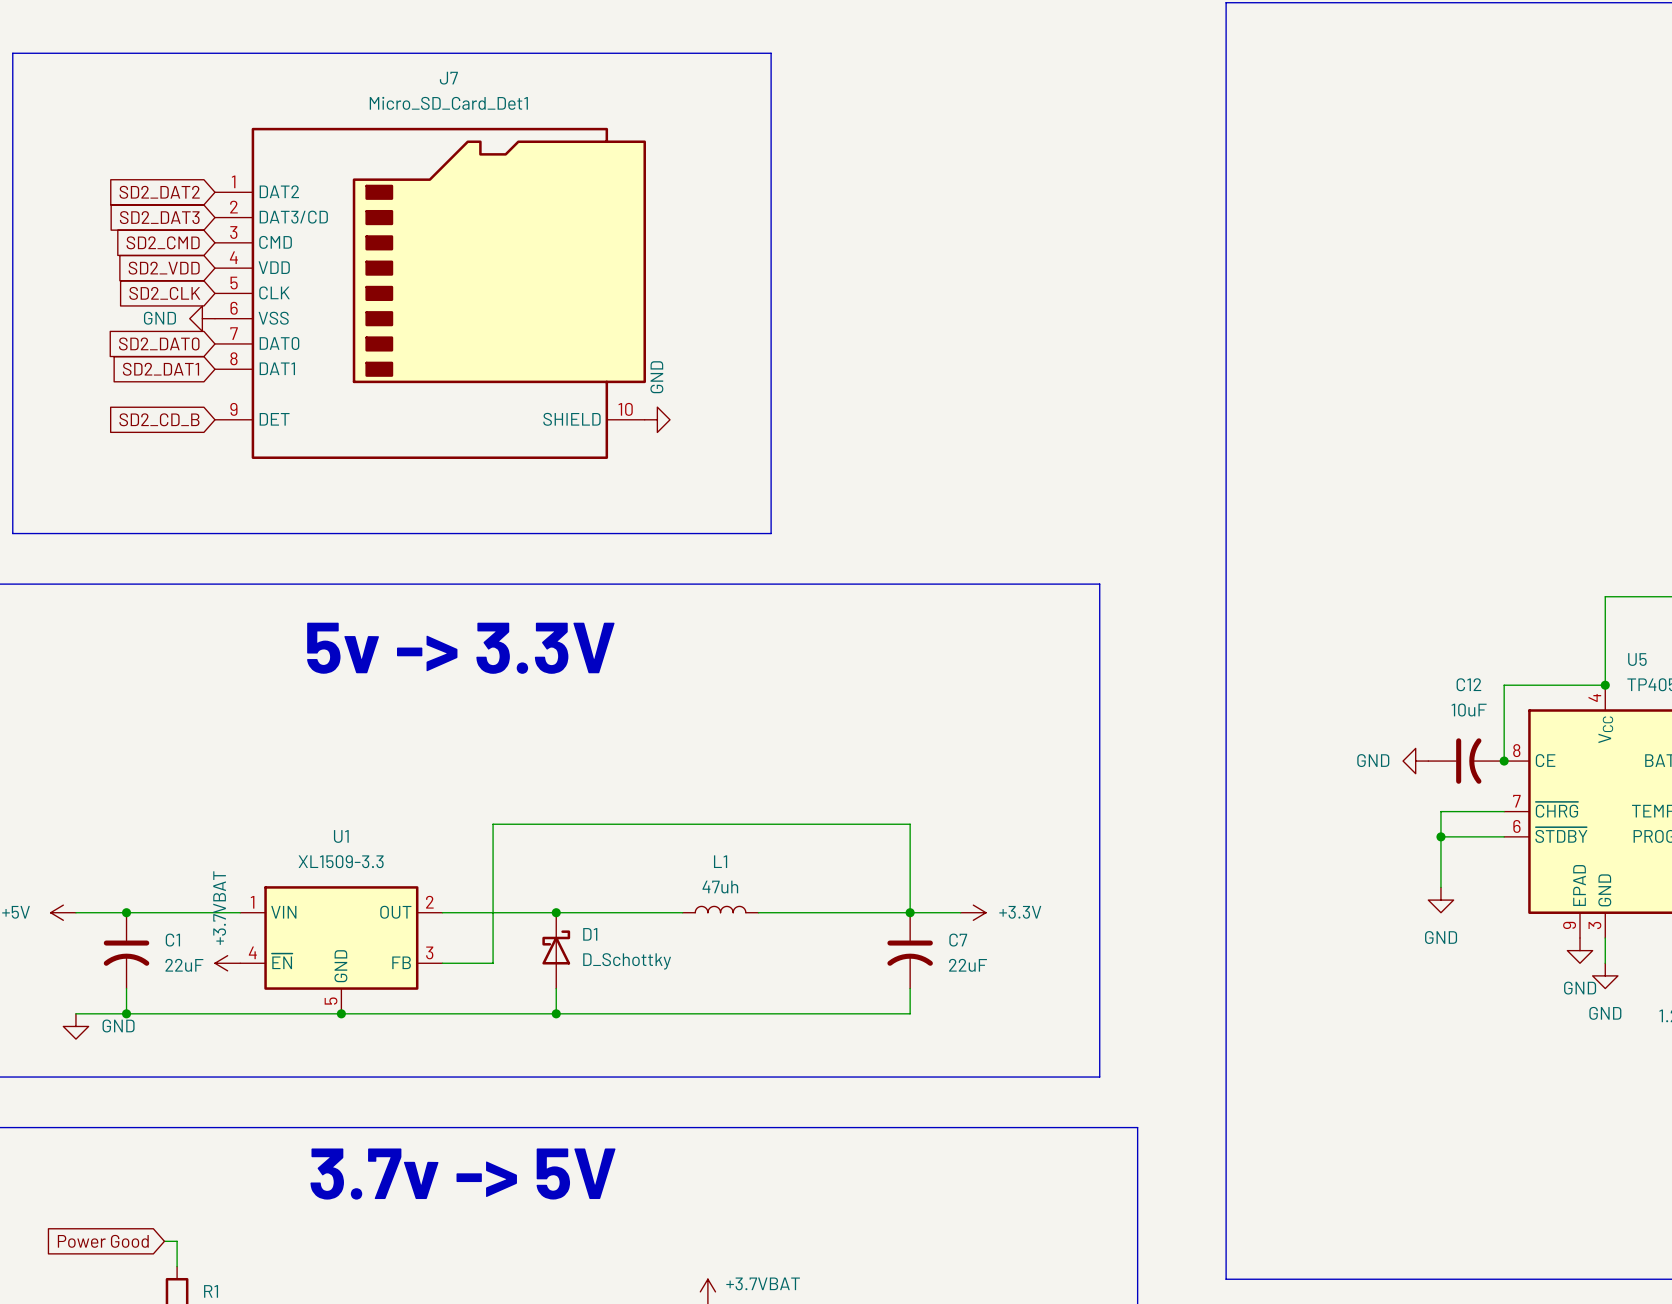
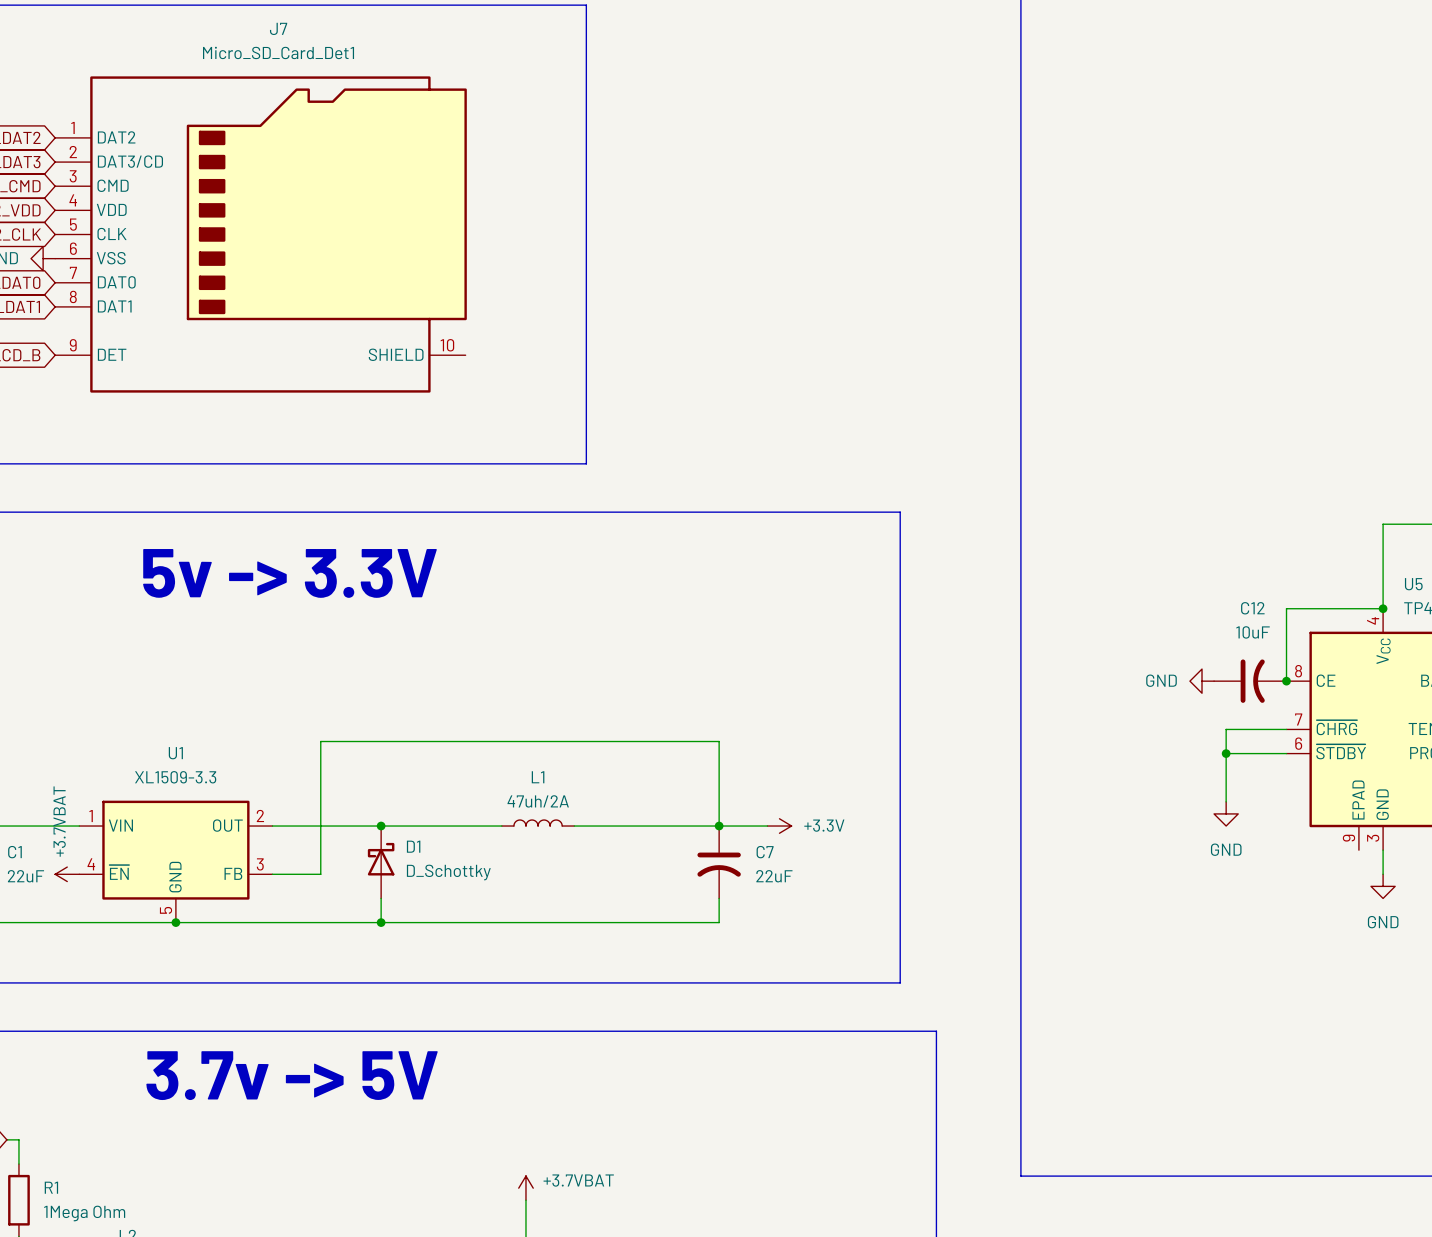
power symbol: GND (657, 419) -> none
L1 value: 47uh (720, 887) -> 47uh/2A (538, 801)
power symbol: GND (1580, 950) -> none

